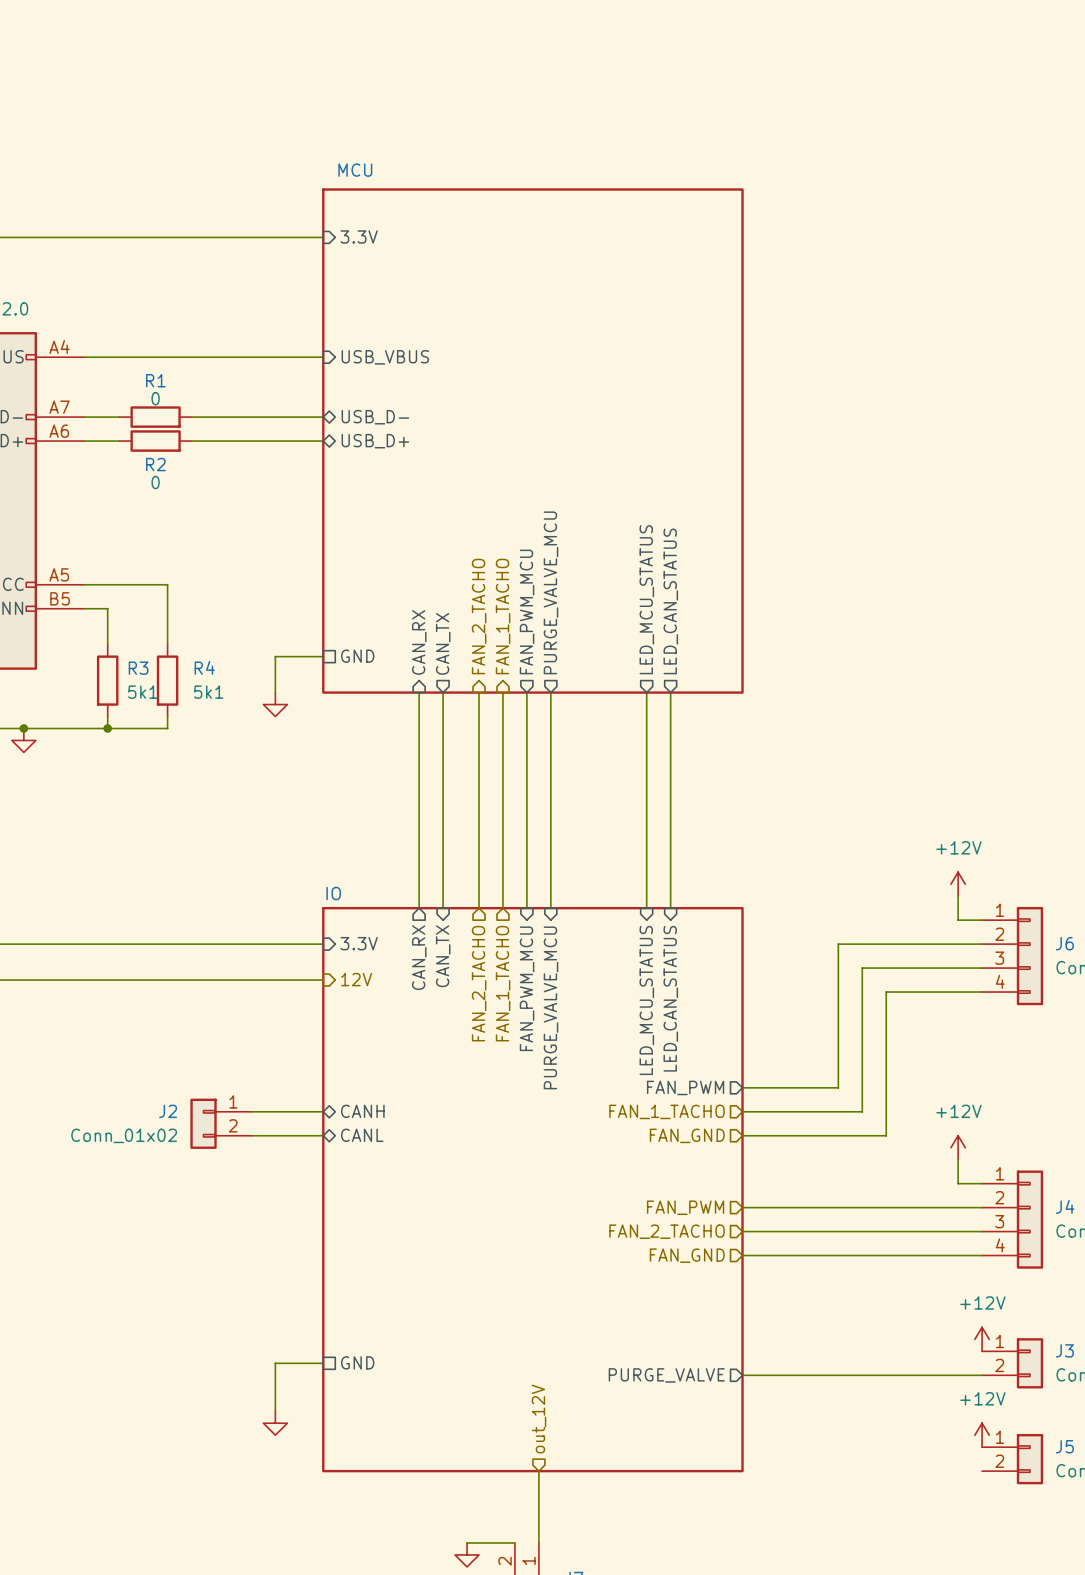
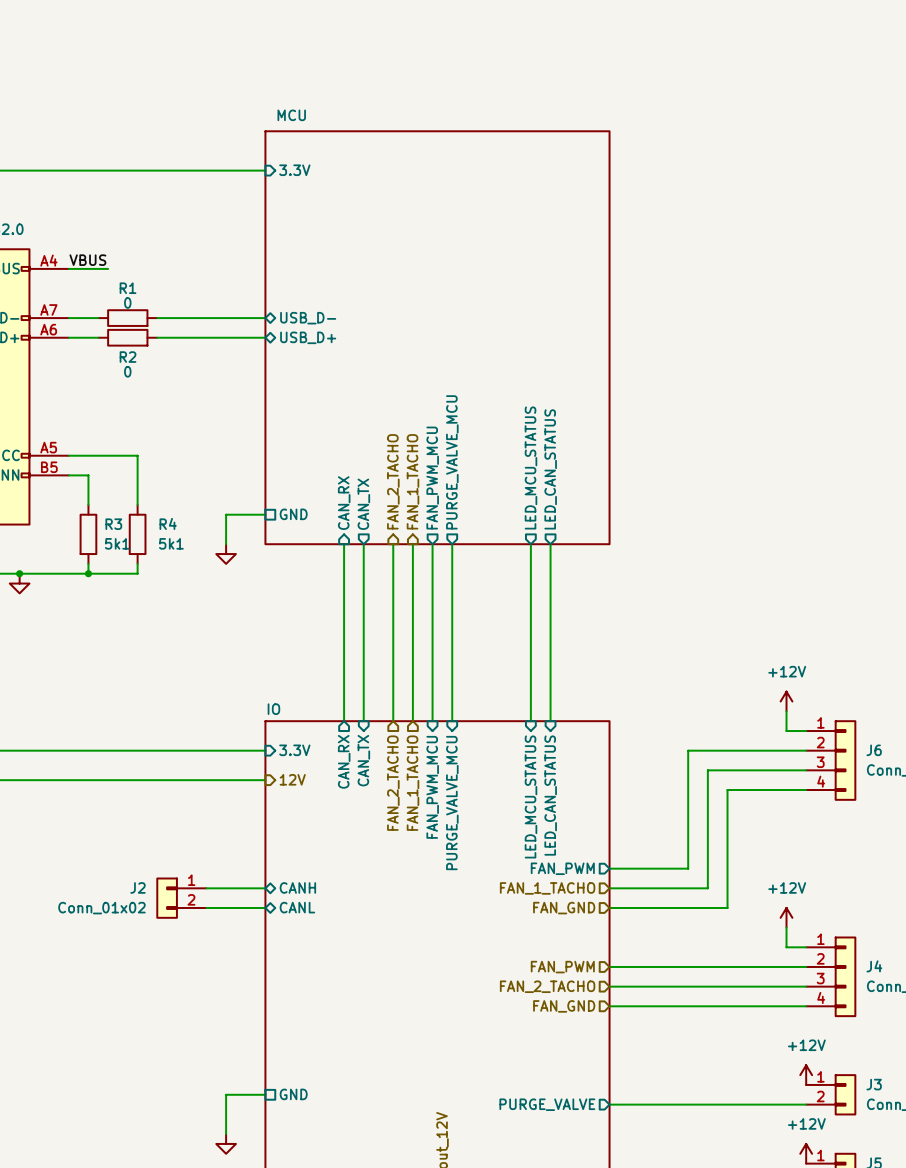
label: none -> VBUS (87, 260)
wire: (131, 357) (323, 357) -> none
sheet pin: USB_VBUS (385, 357) -> none

